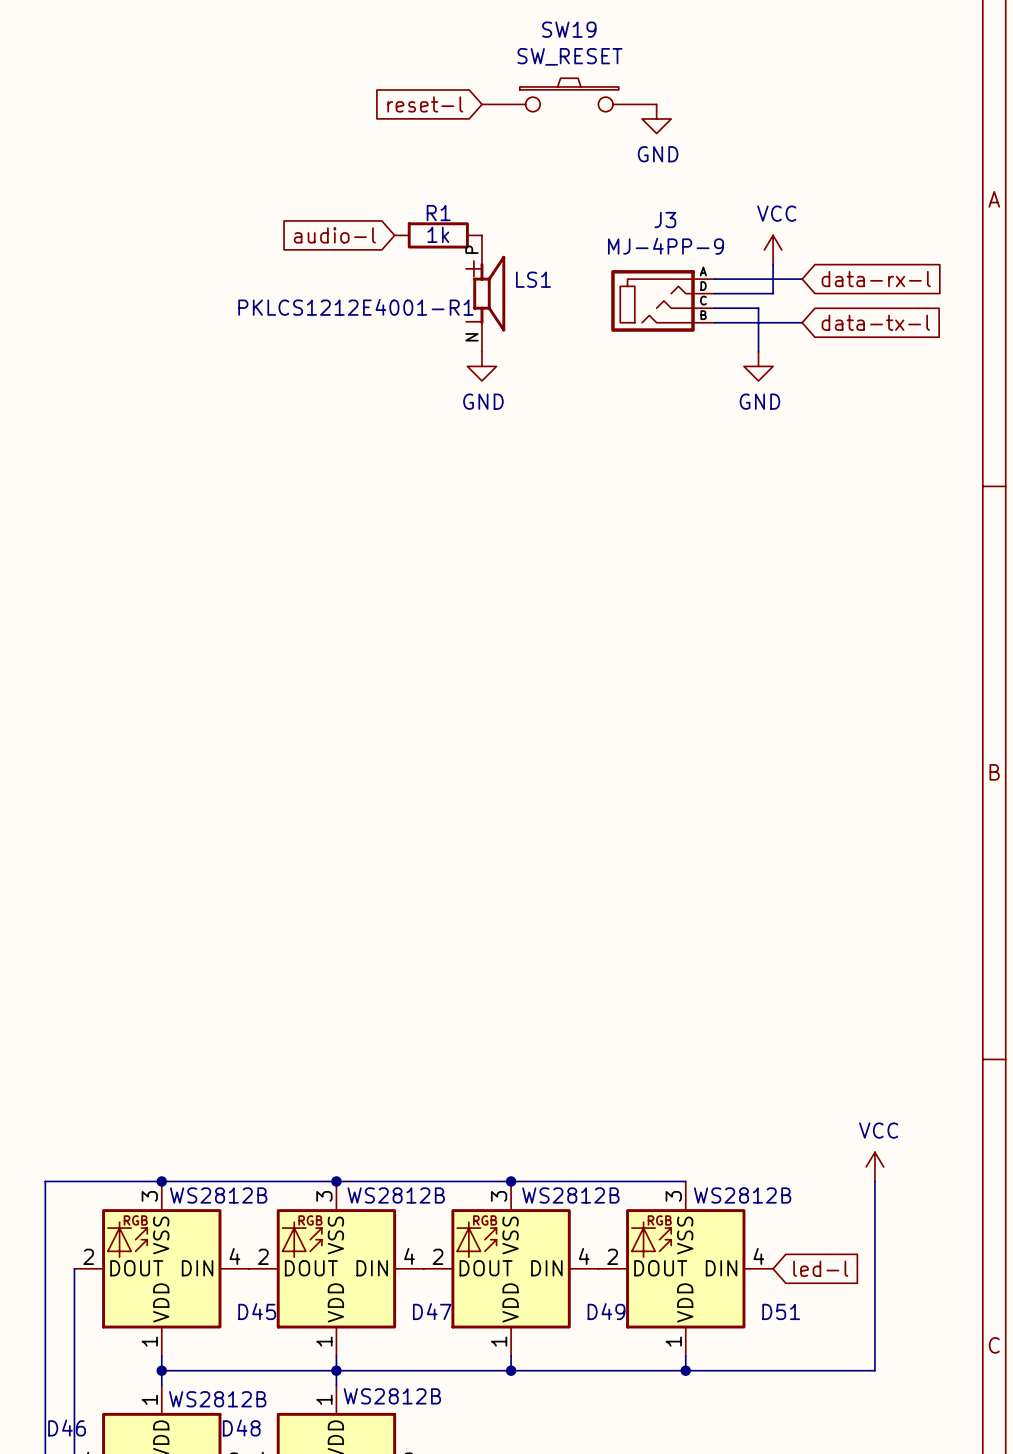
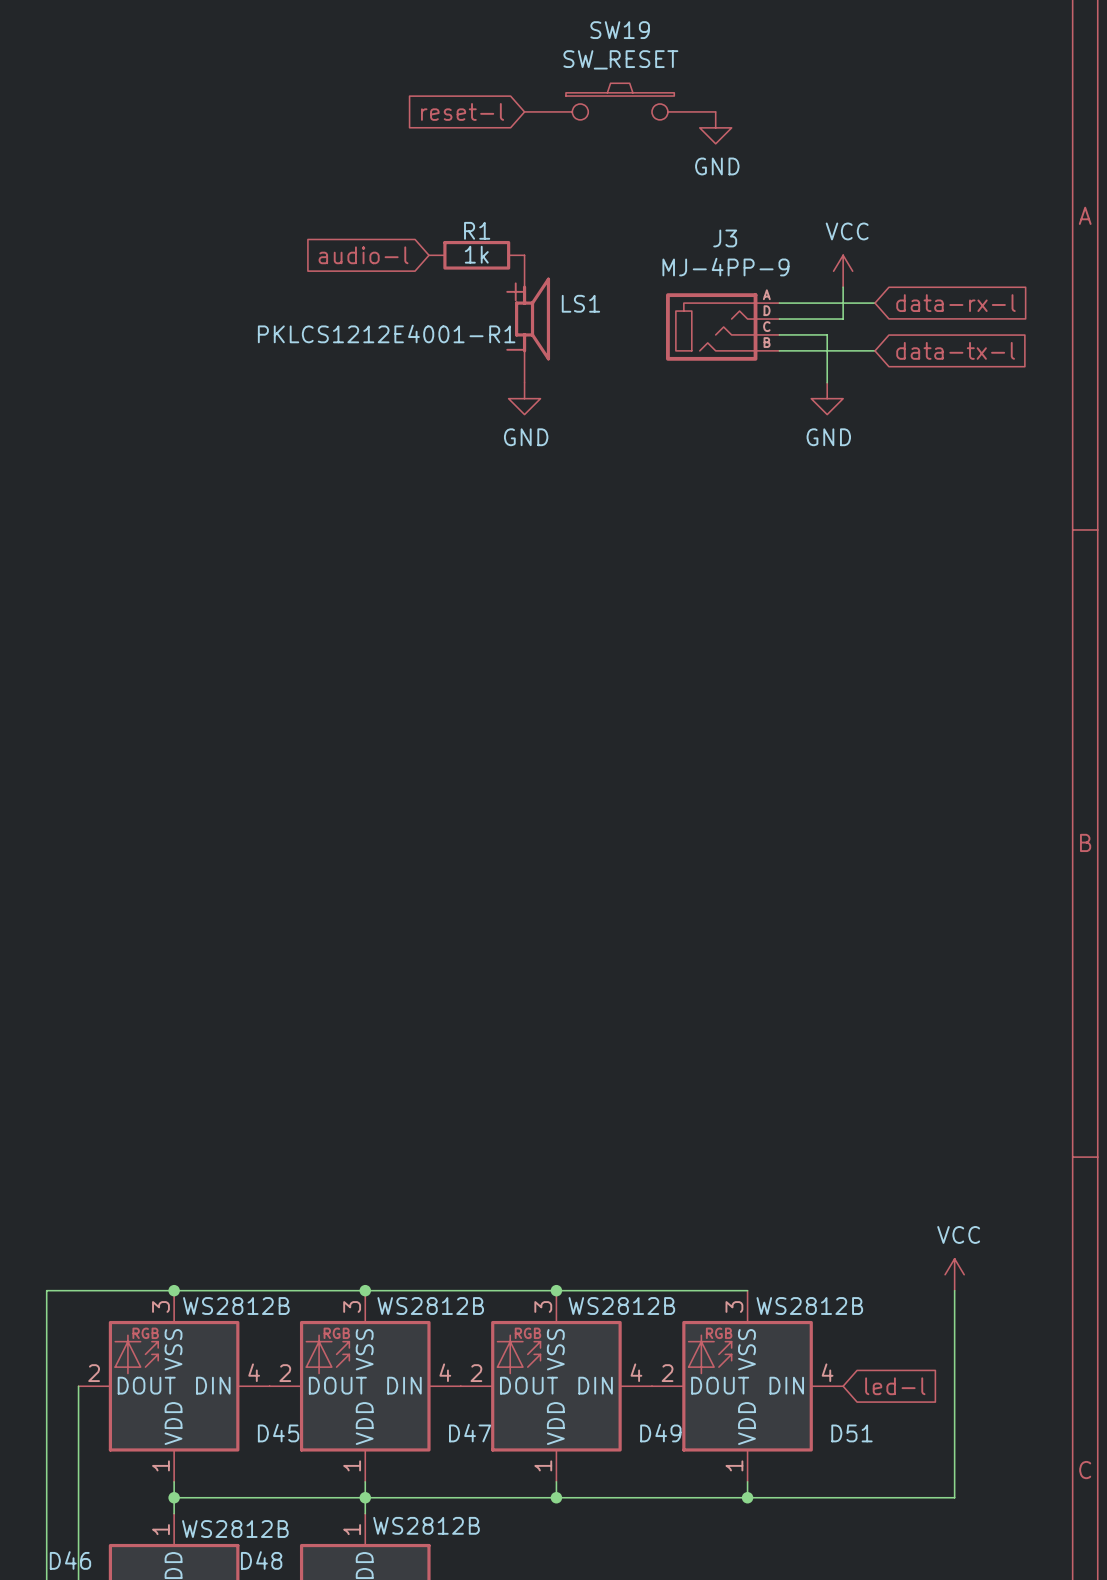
LS1 pin number: P (471, 249) -> none
LS1 pin number: N (471, 337) -> none

